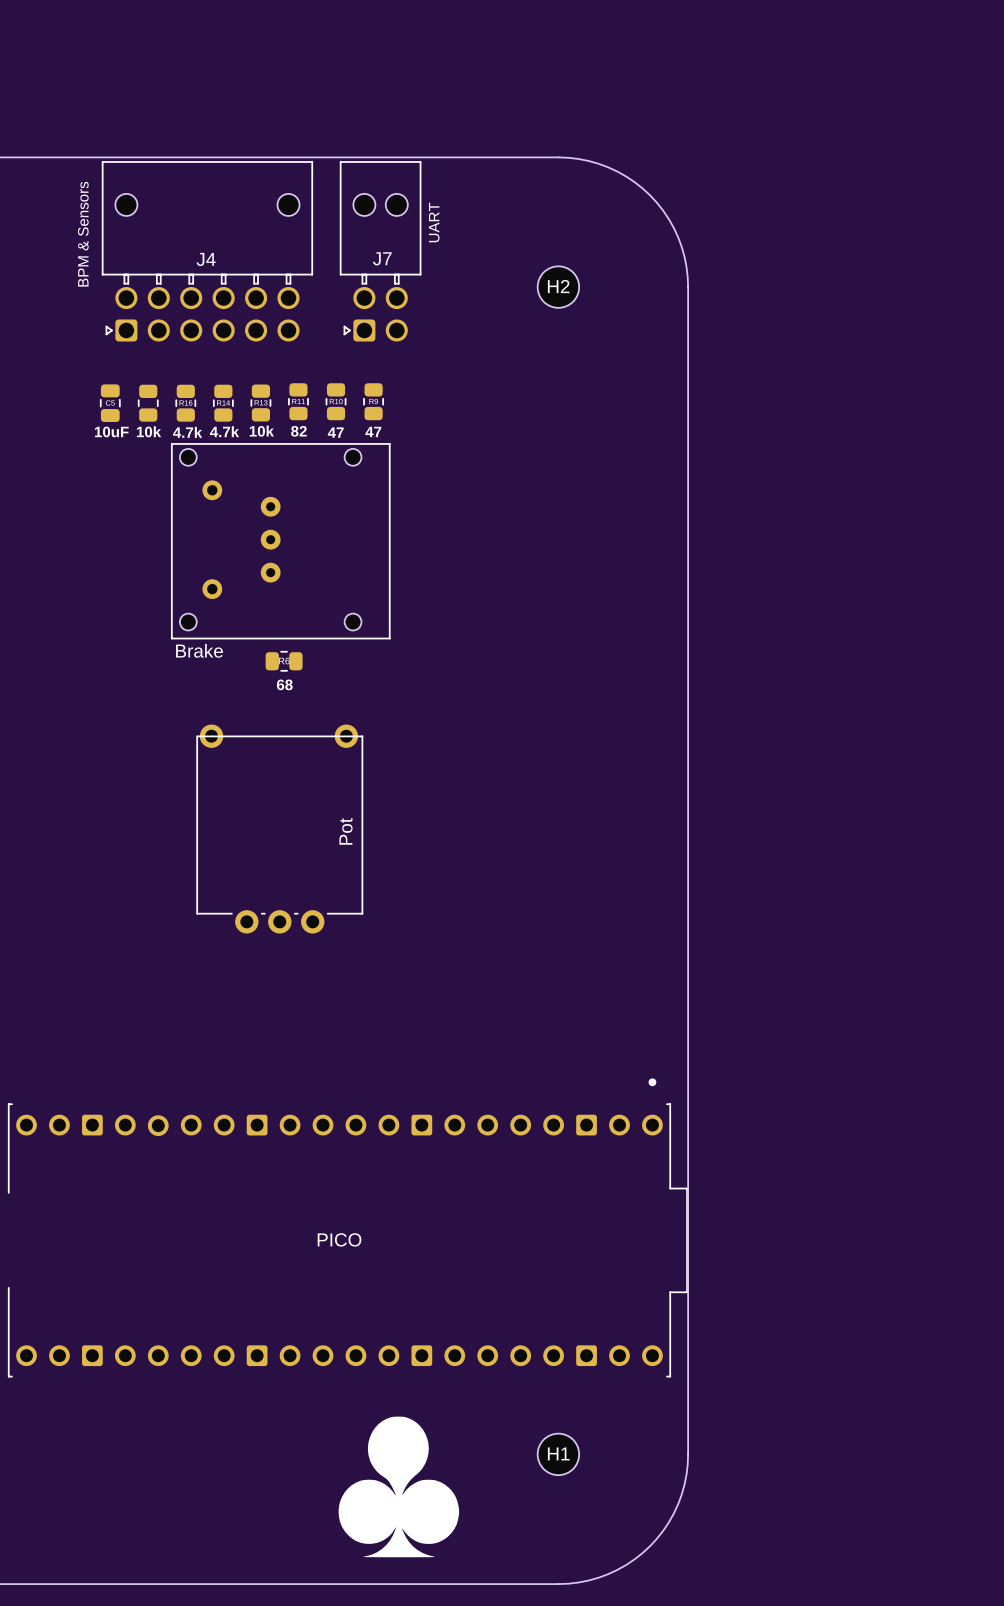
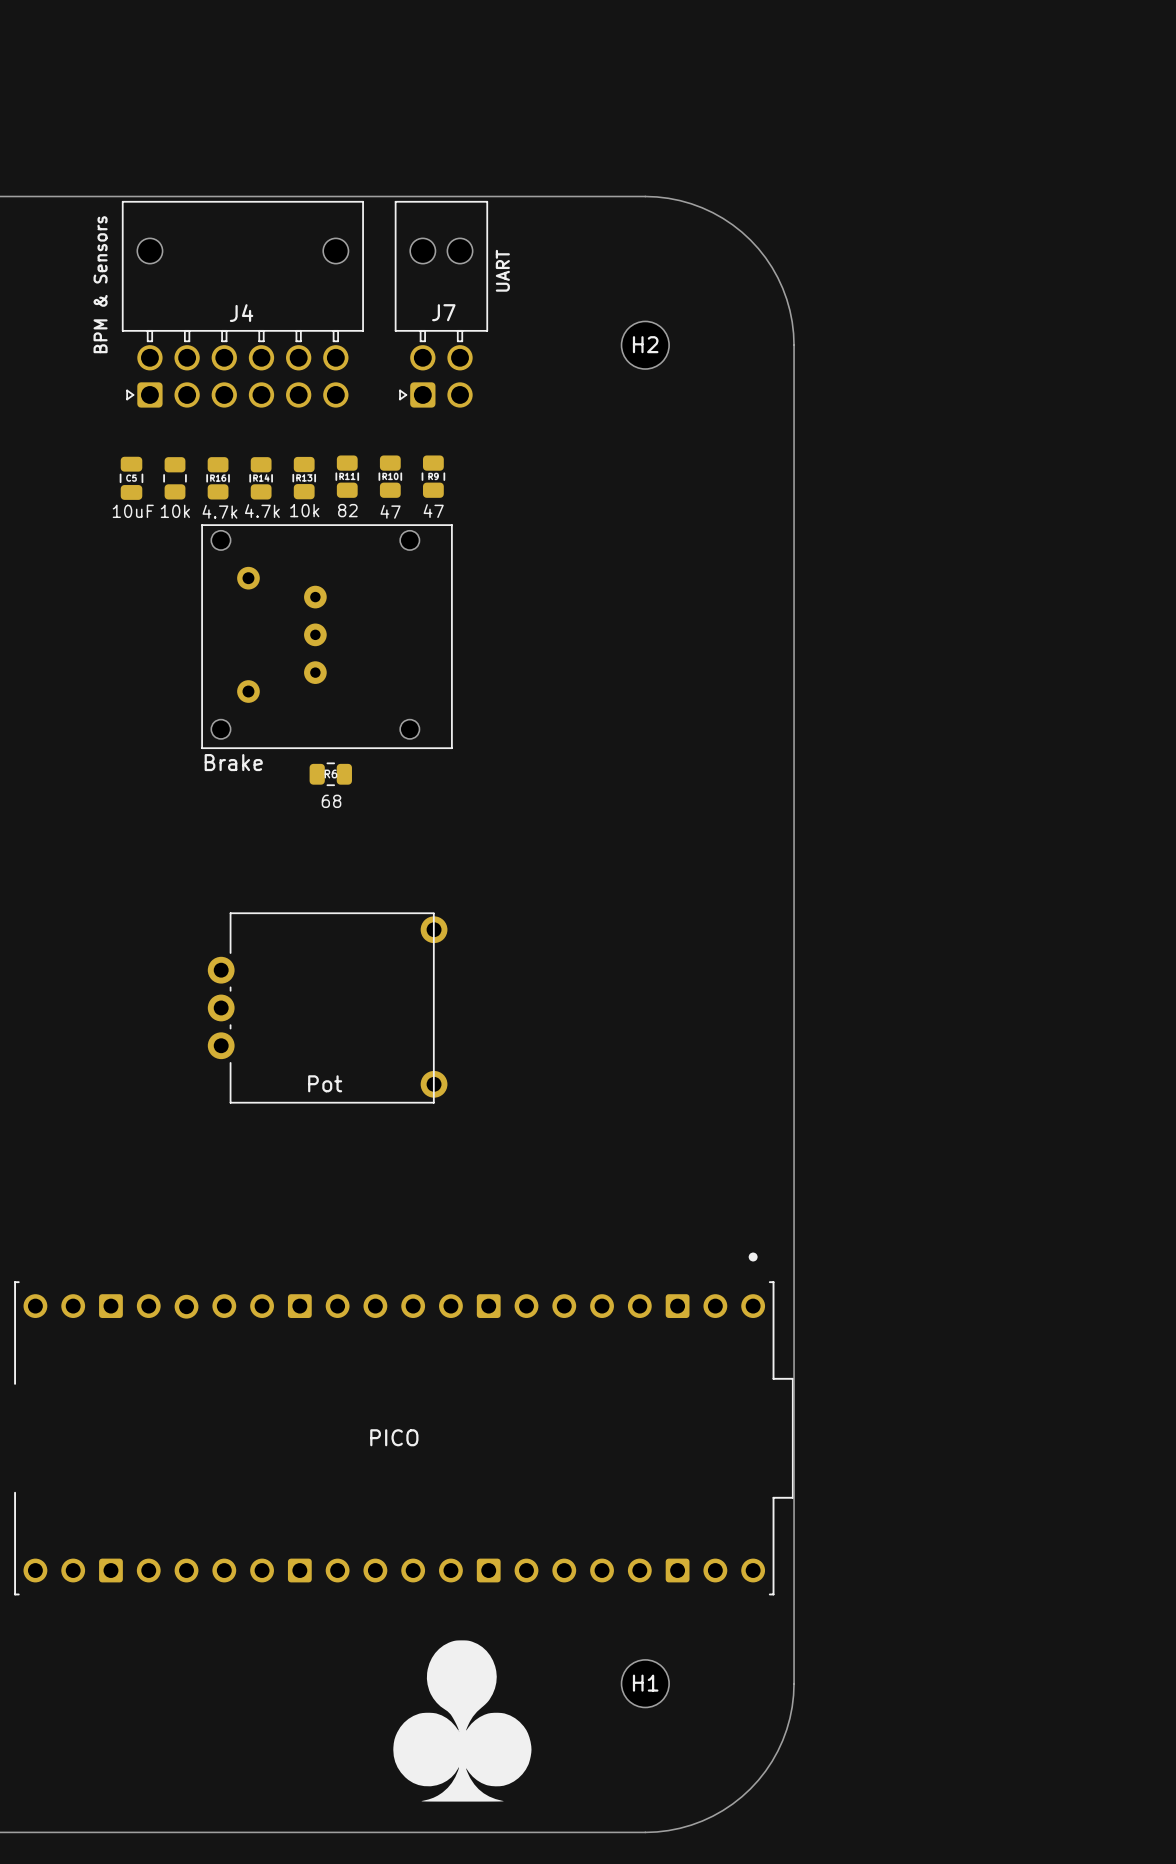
part rotation: 0° (279, 829) -> 90° clockwise (327, 1007)

